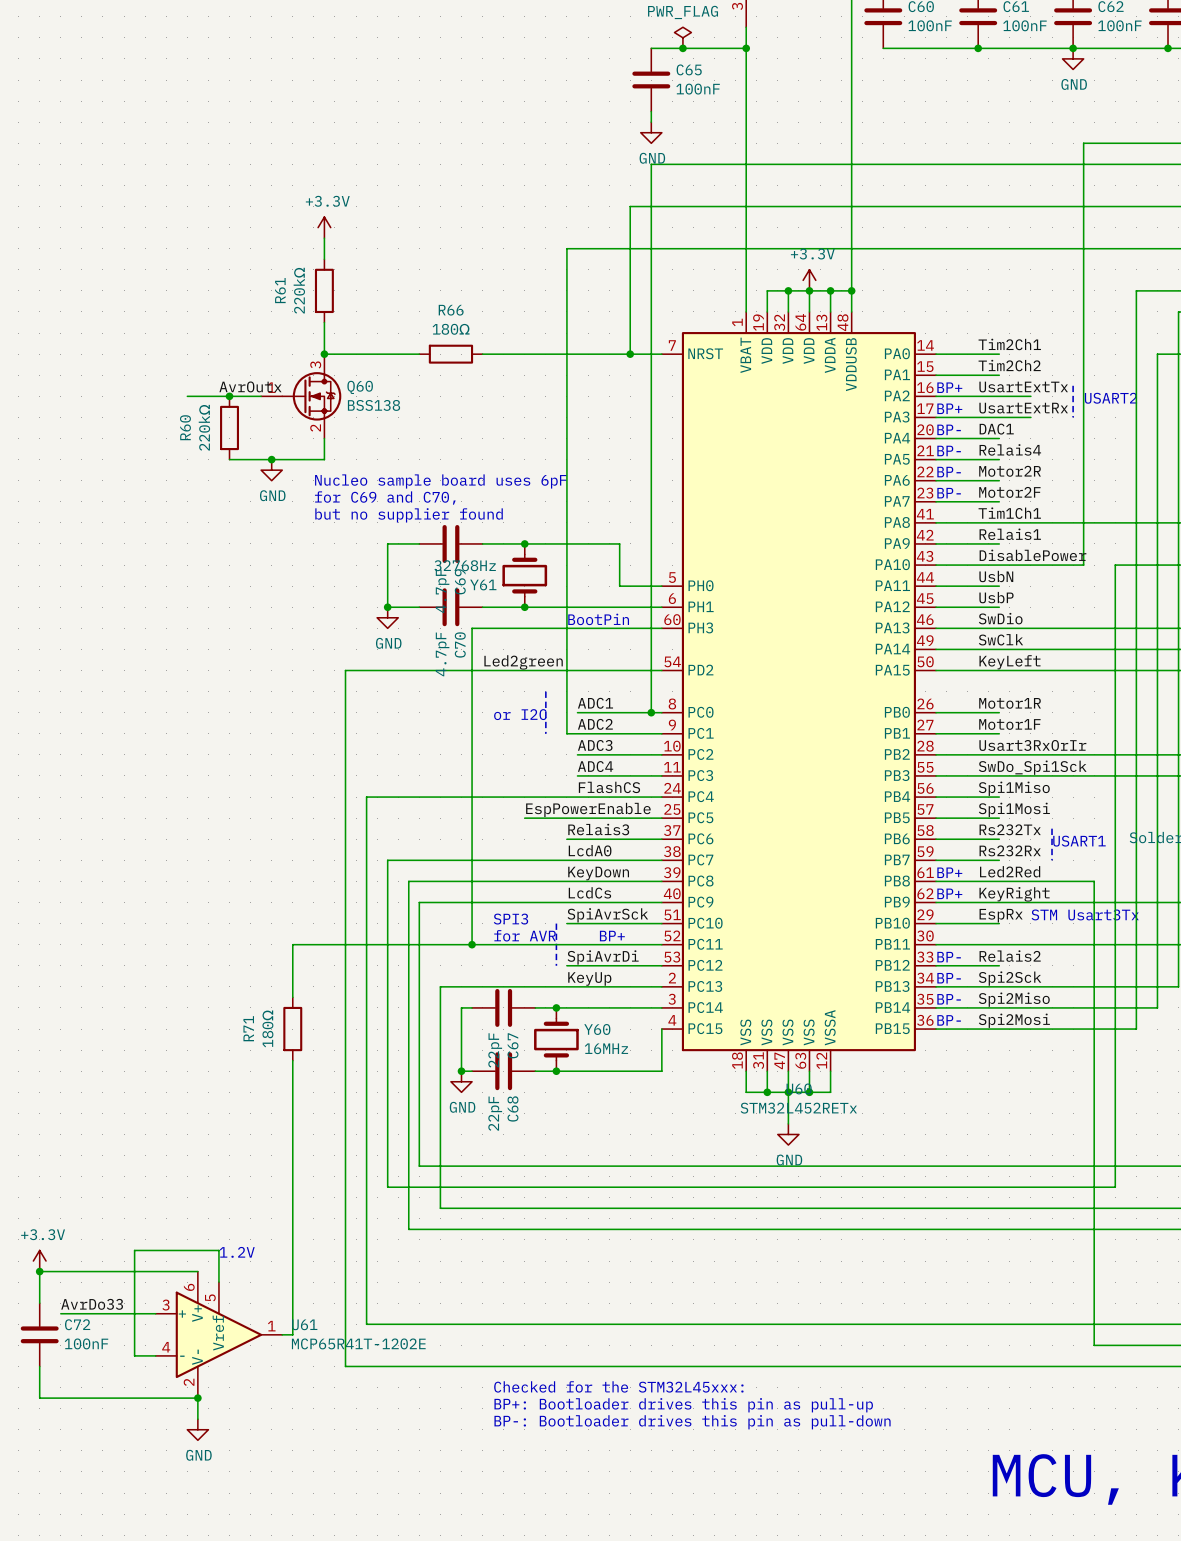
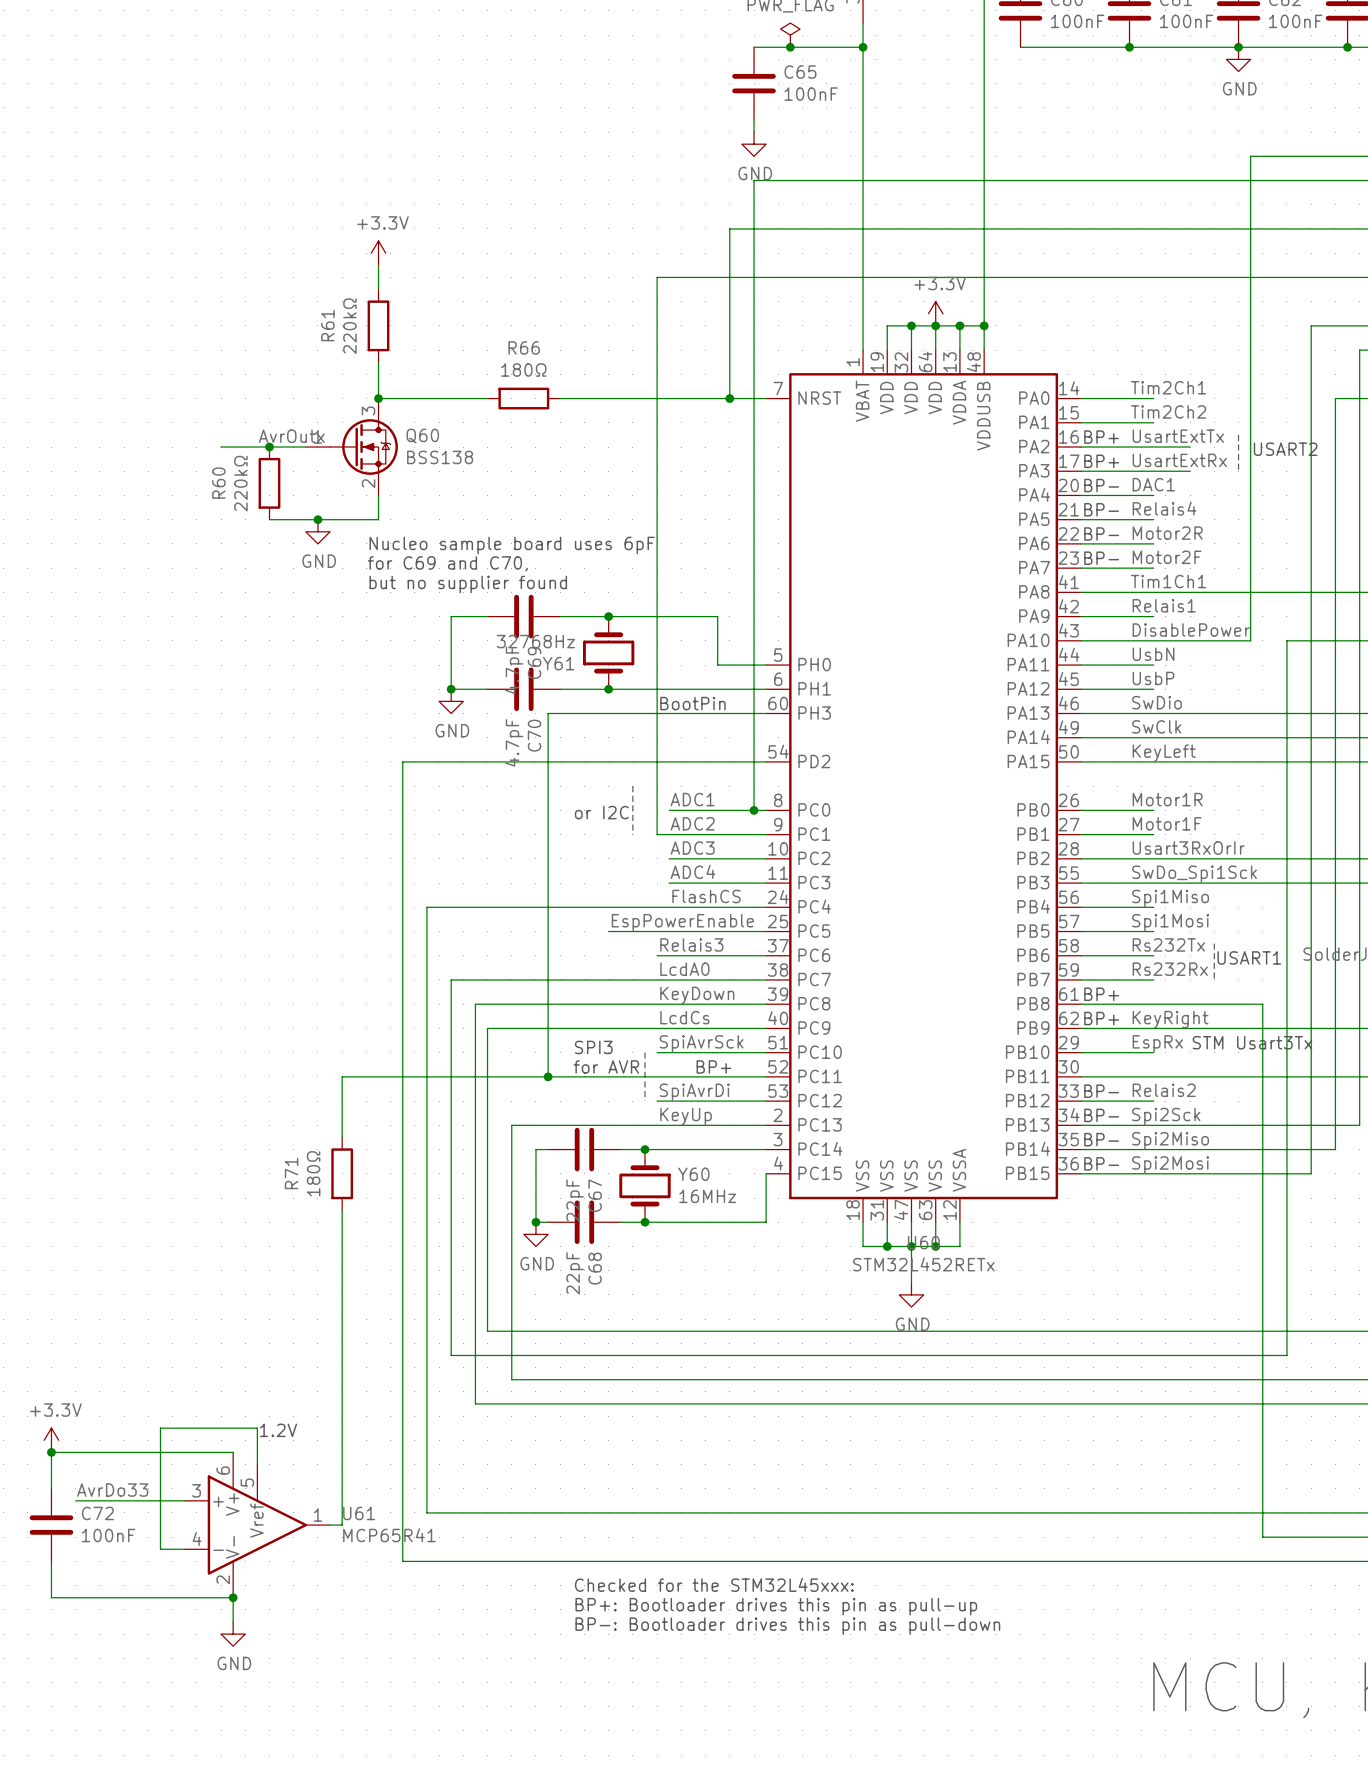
label: Led2green (523, 662) -> none
label: Led2Red (1010, 871) -> none
U61 value: MCP65R41T-1202E (358, 1343) -> MCP65R41 (389, 1535)

